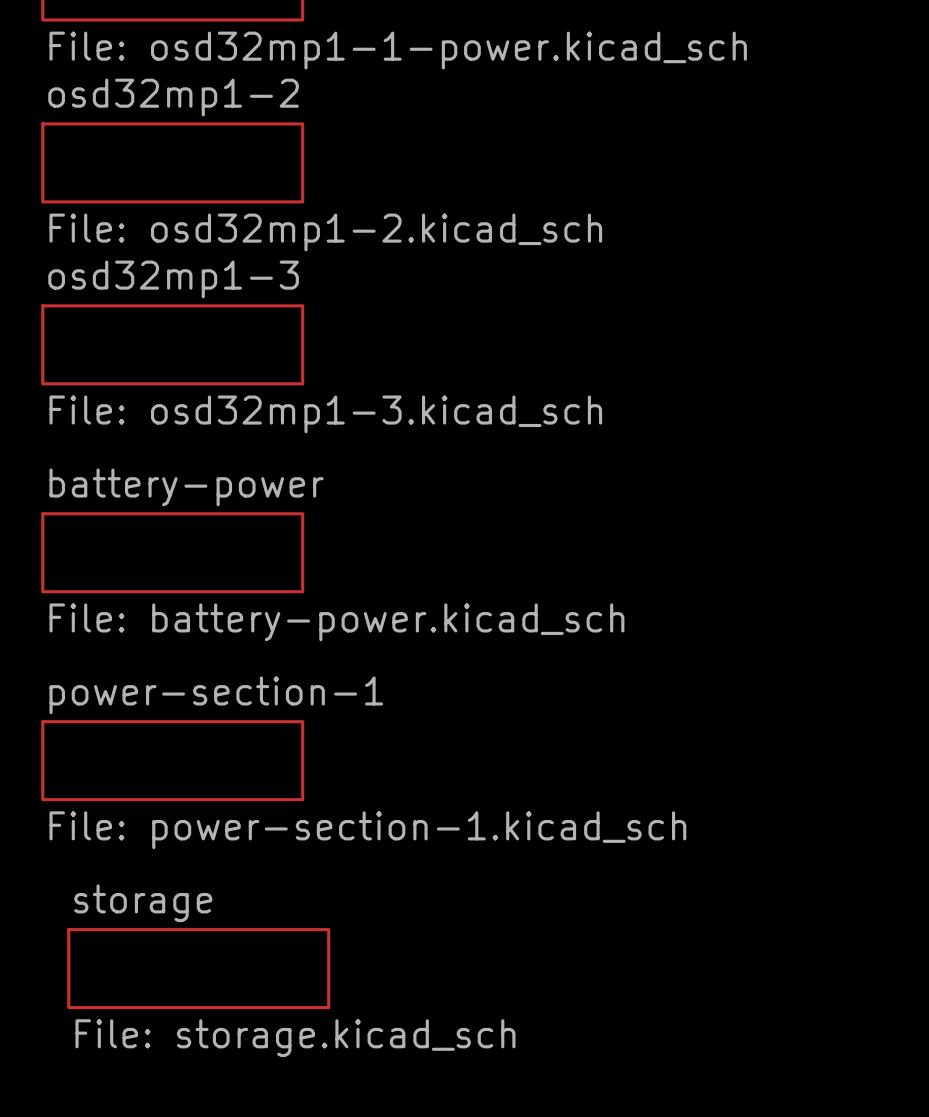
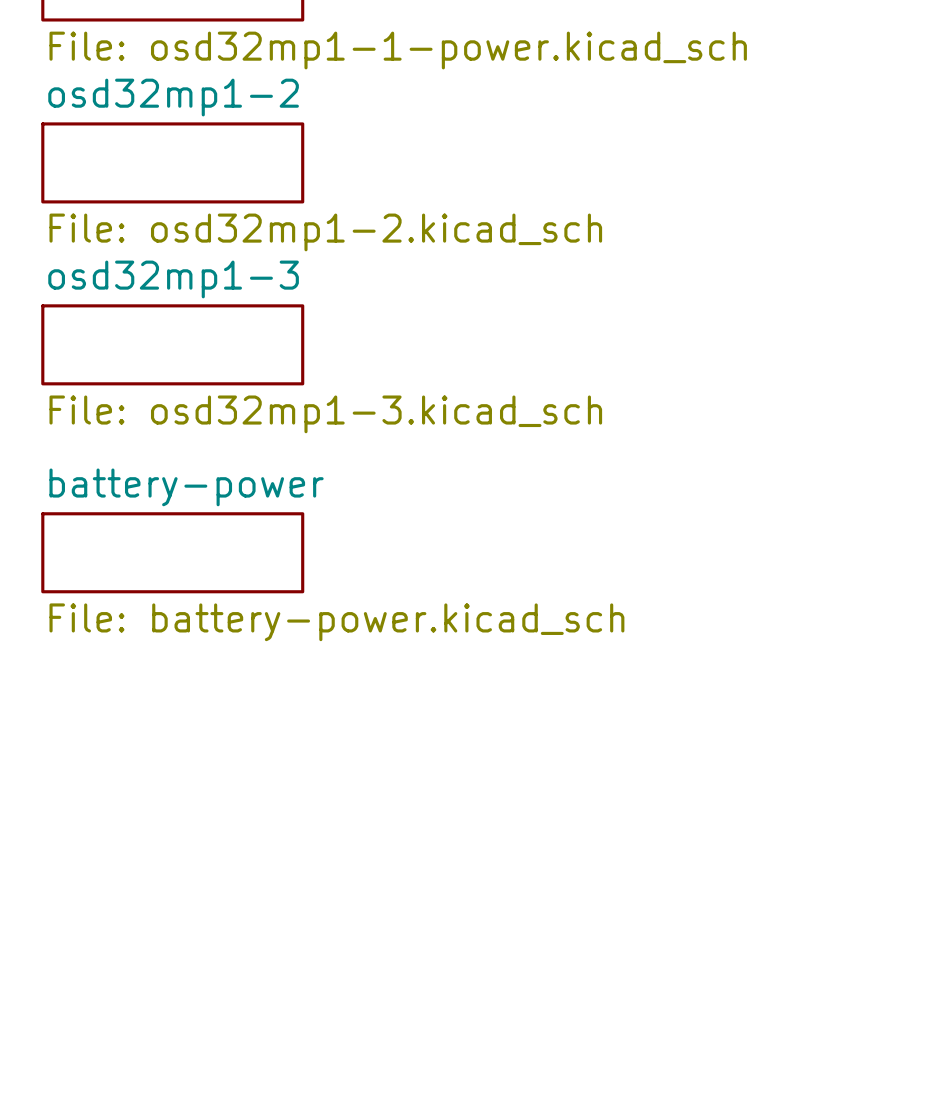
sheet power-section-1: File: power-section-1.kicad_sch (172, 760) -> none
sheet storage: File: storage.kicad_sch (198, 968) -> none

